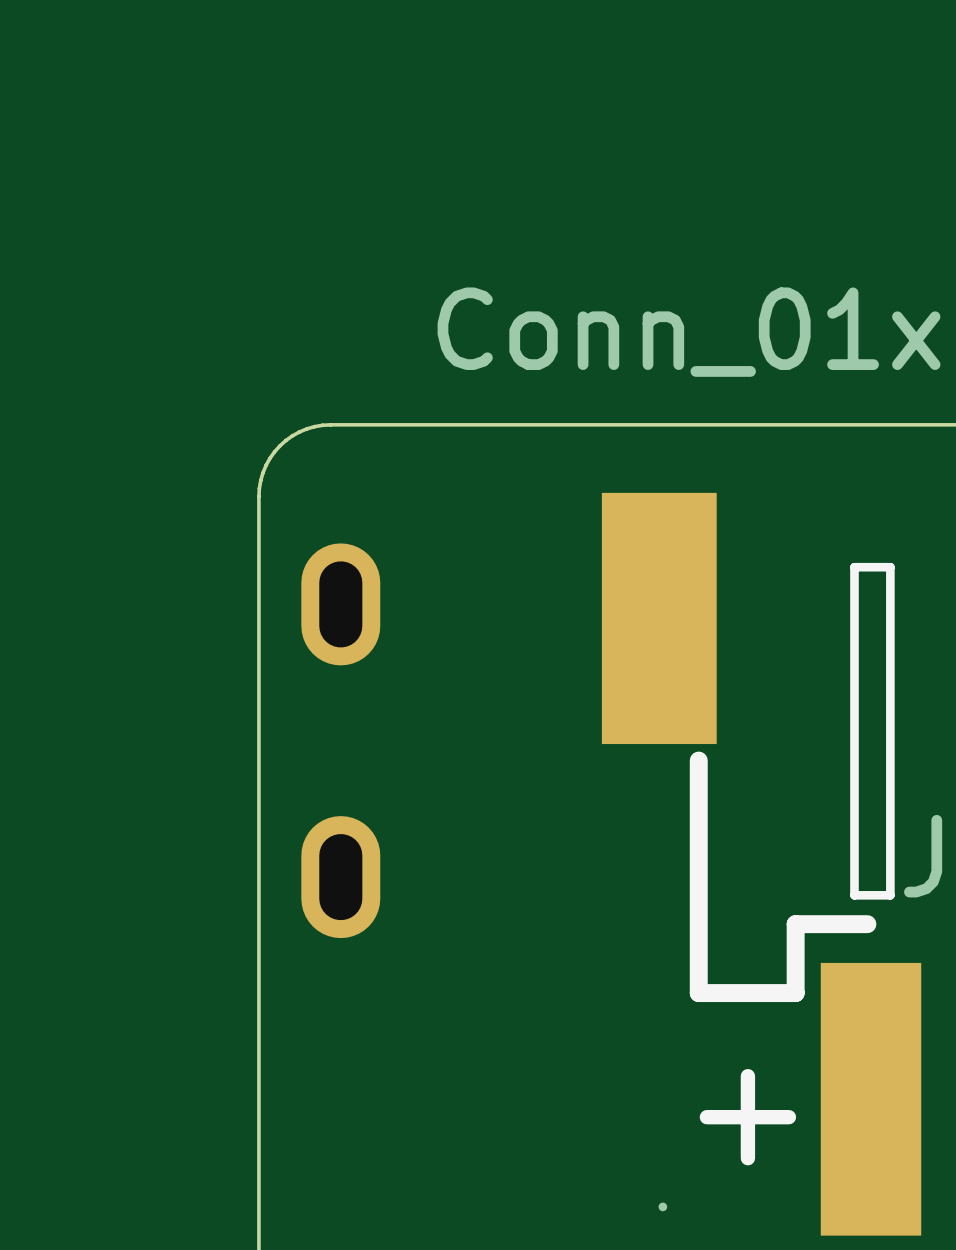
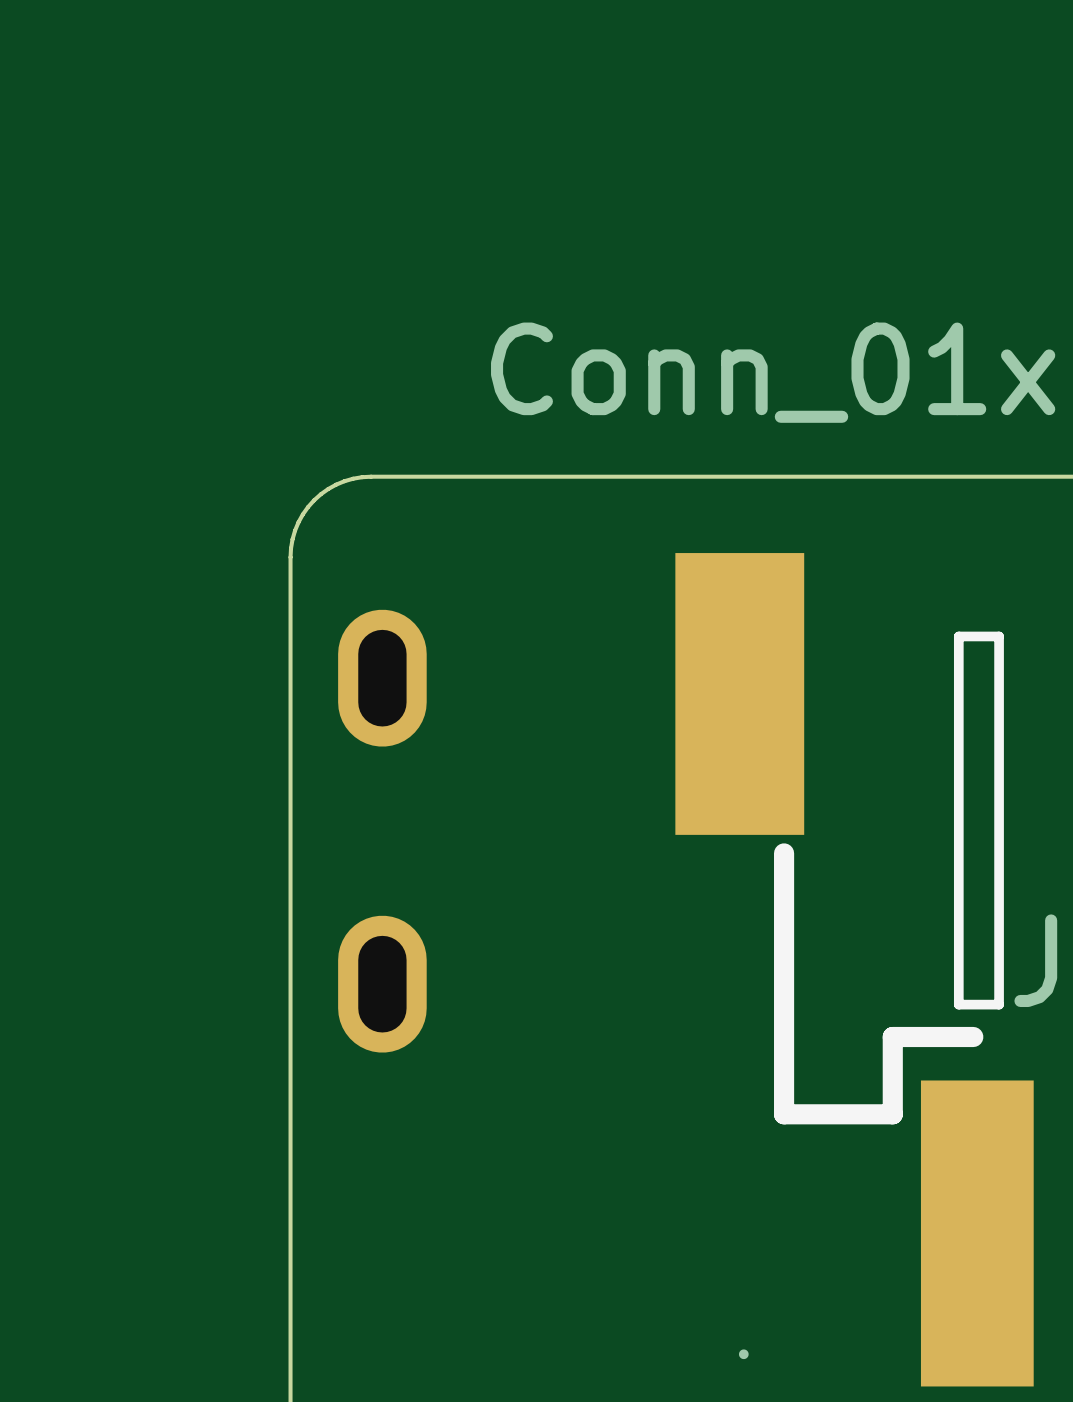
text: + (747, 1117) -> none

